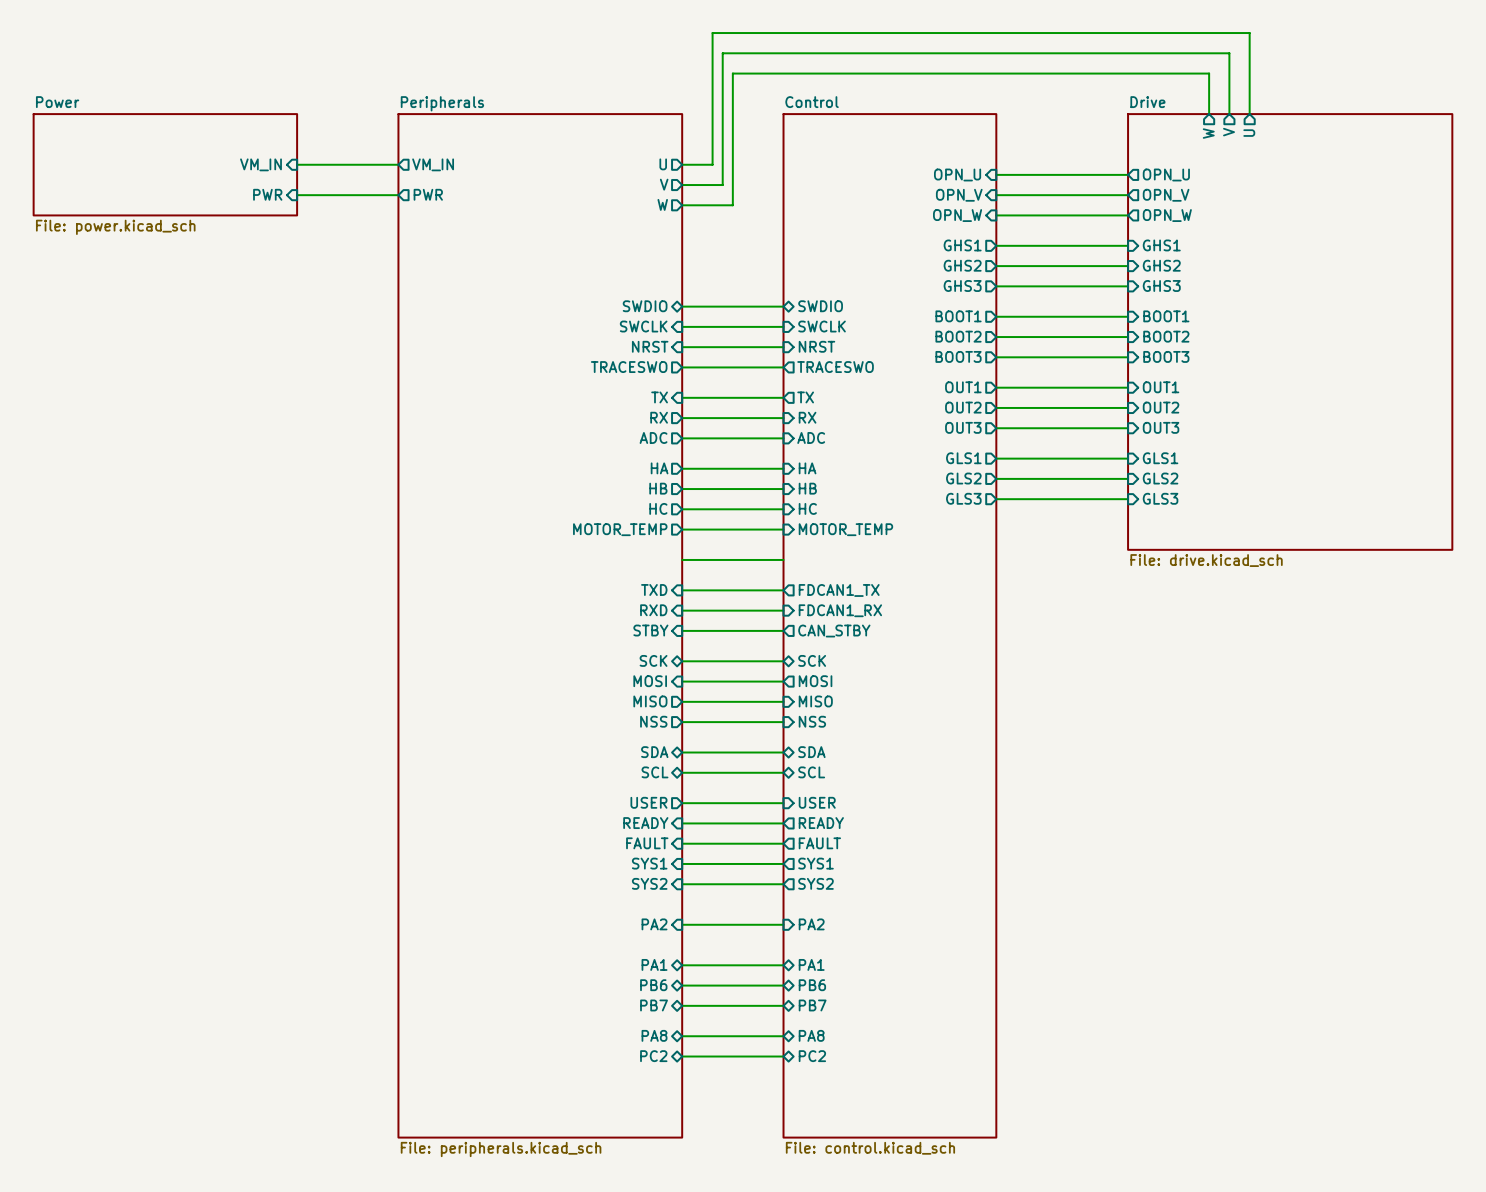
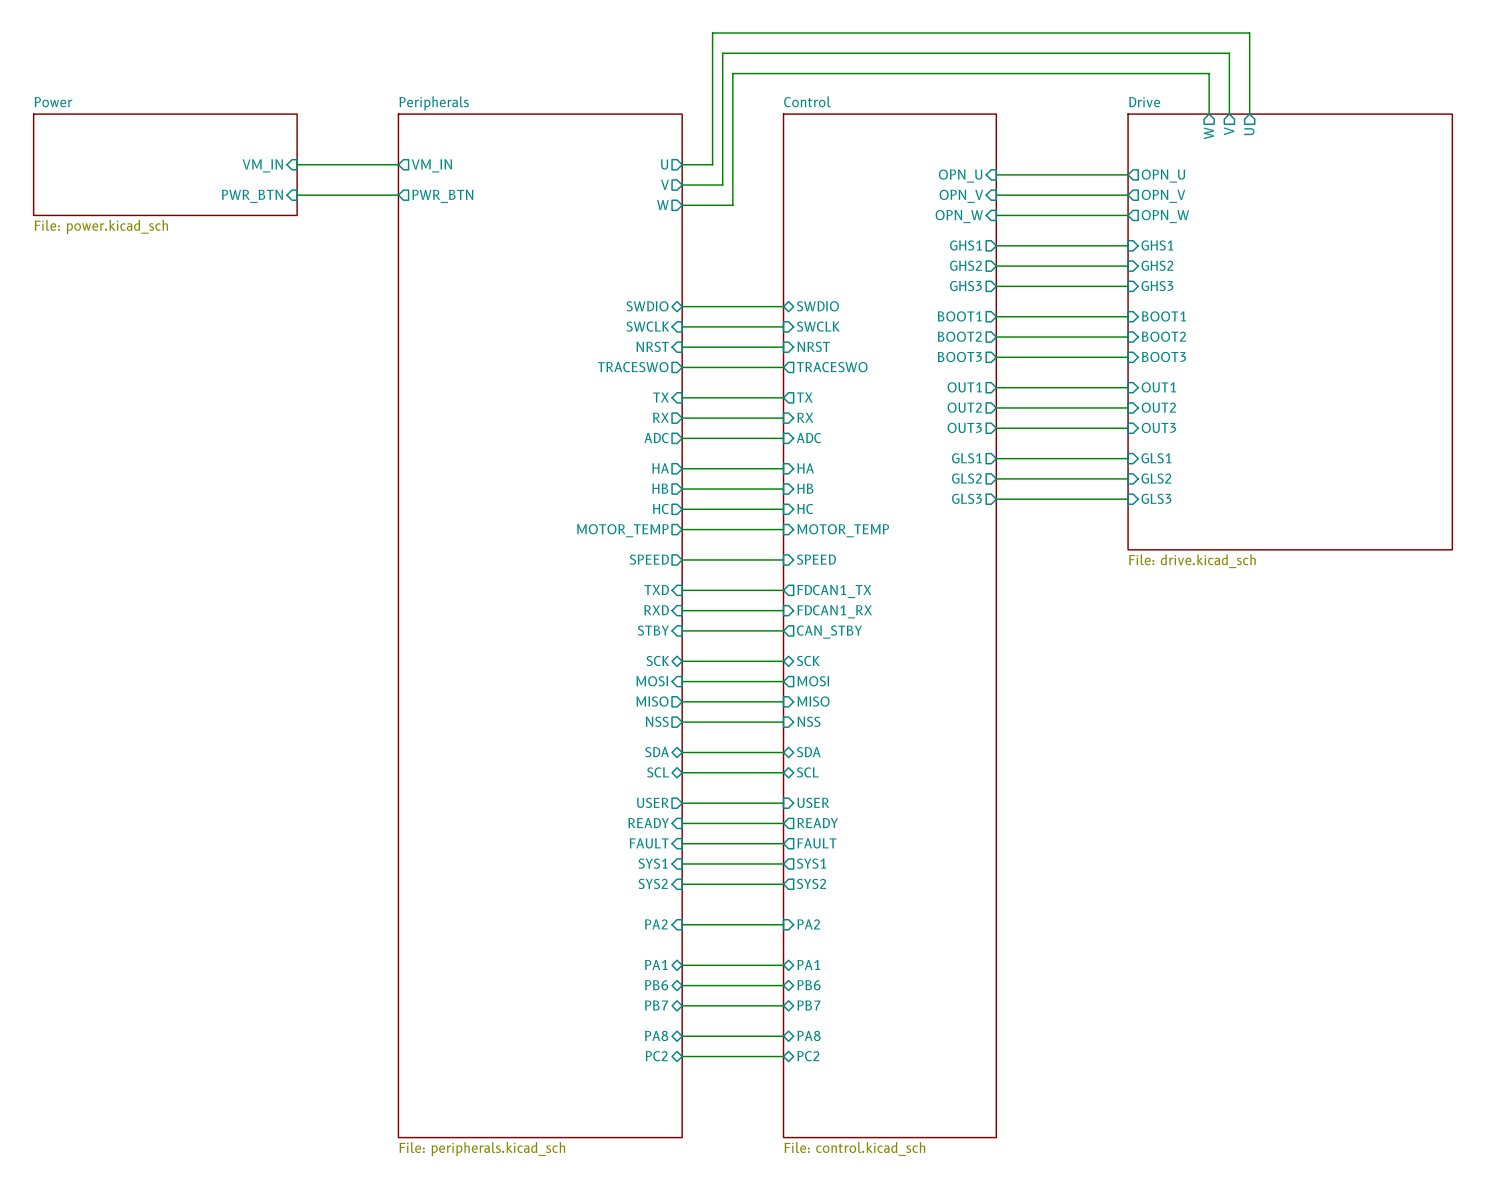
sheet pin: PWR (267, 194) -> PWR_BTN (252, 196)
sheet pin: PWR (428, 194) -> PWR_BTN (442, 196)
sheet pin: none -> SPEED (649, 559)
sheet pin: none -> SPEED (816, 559)

